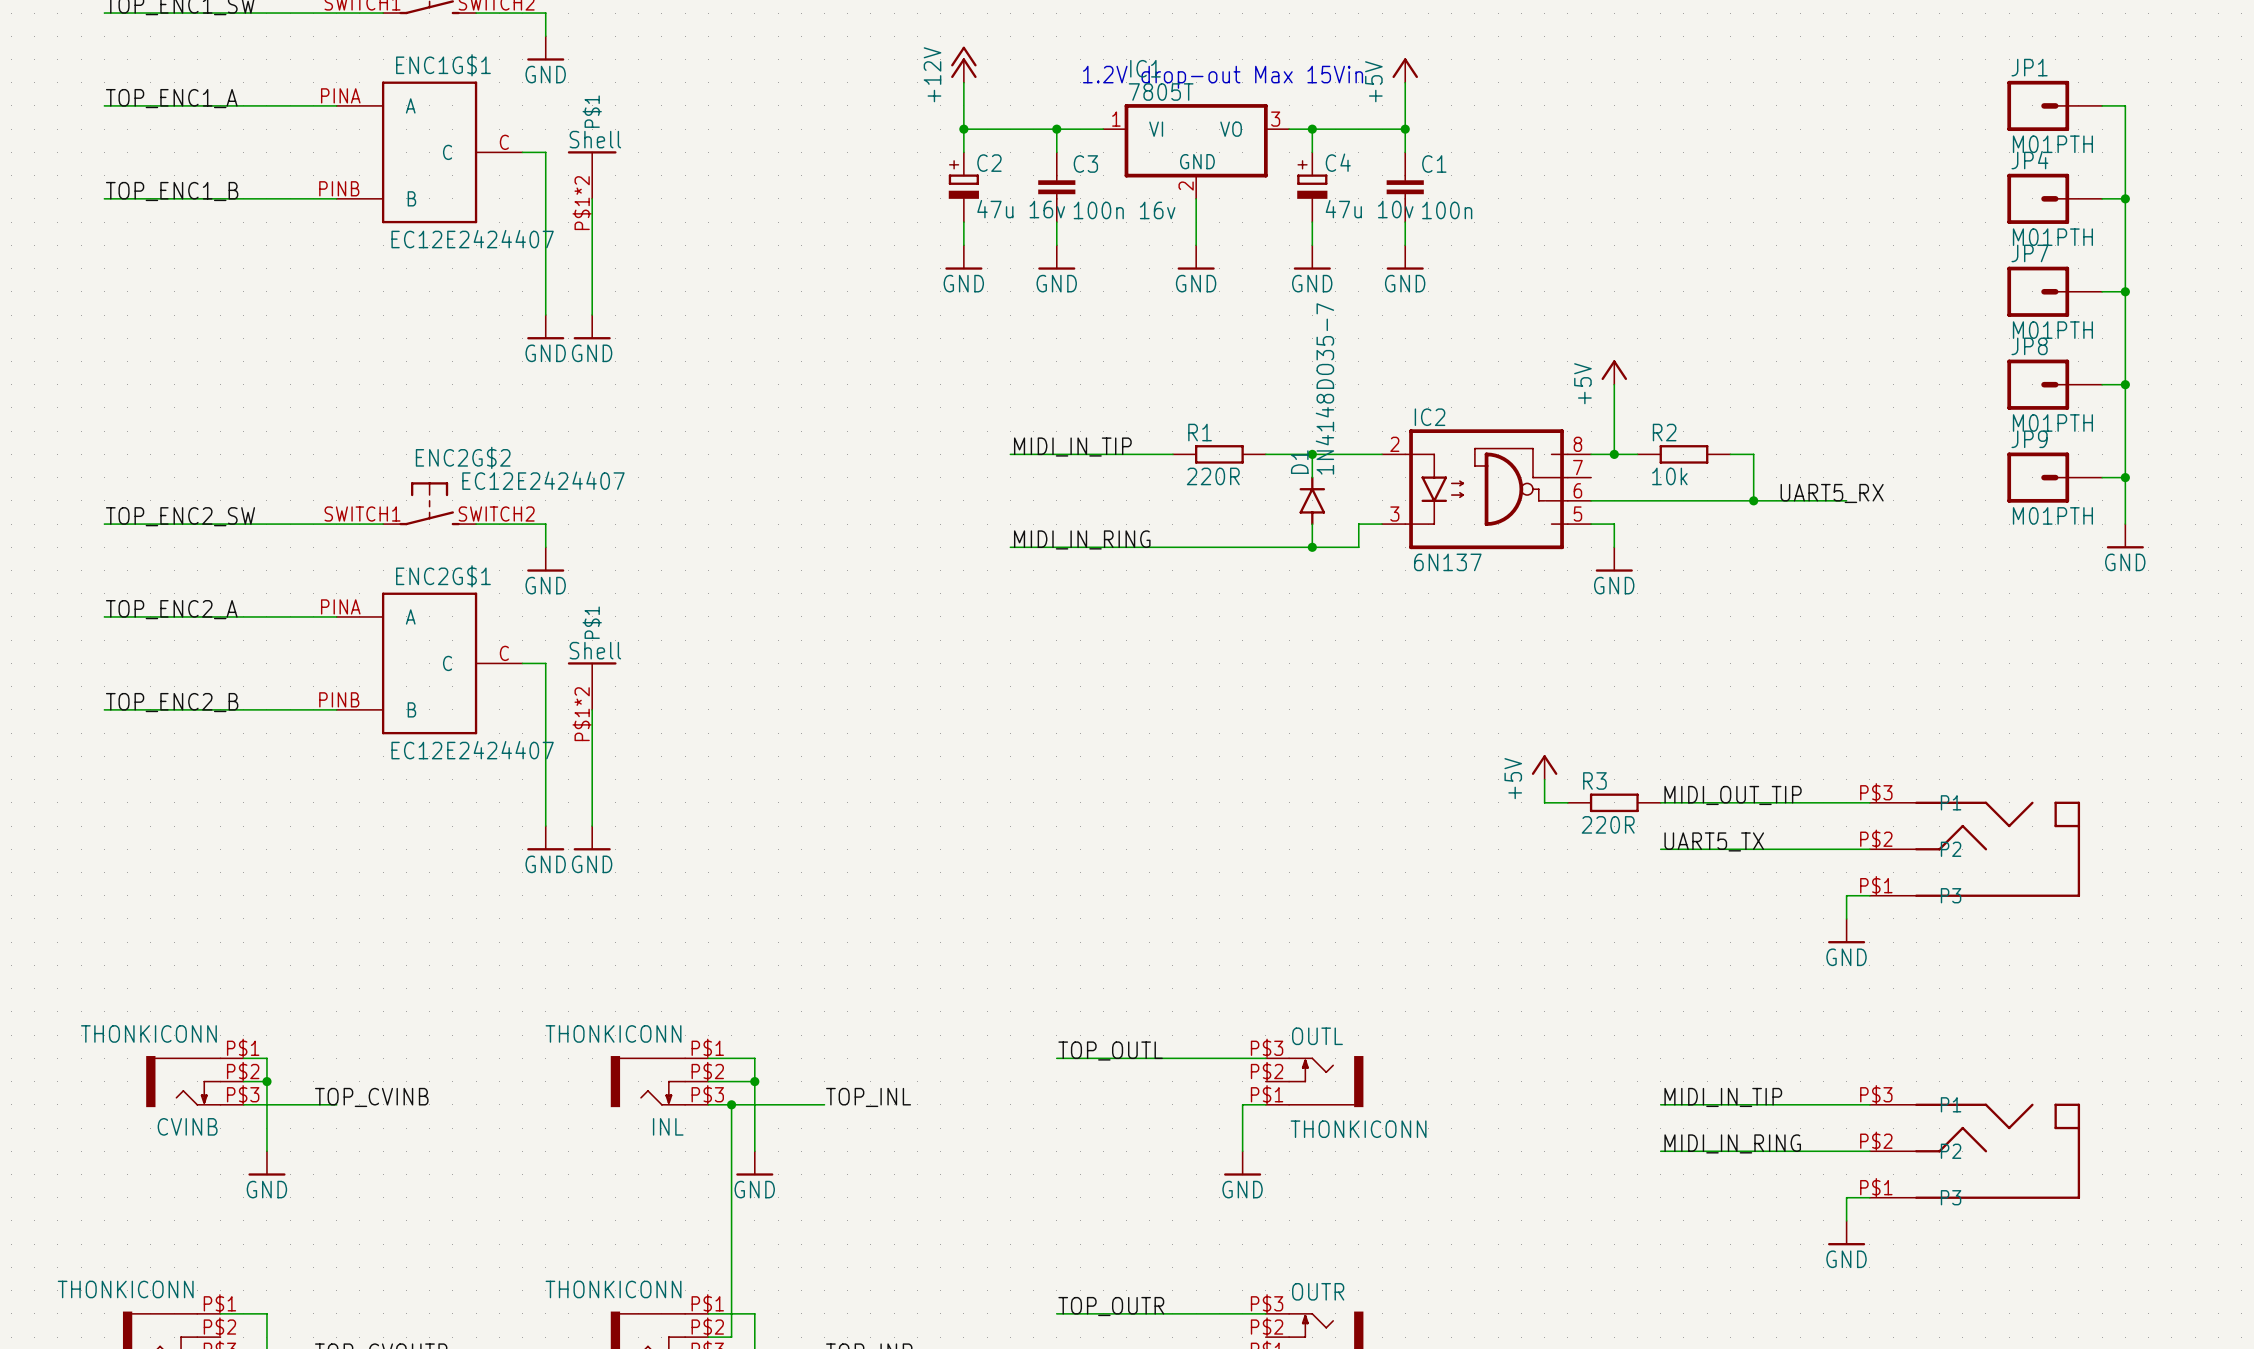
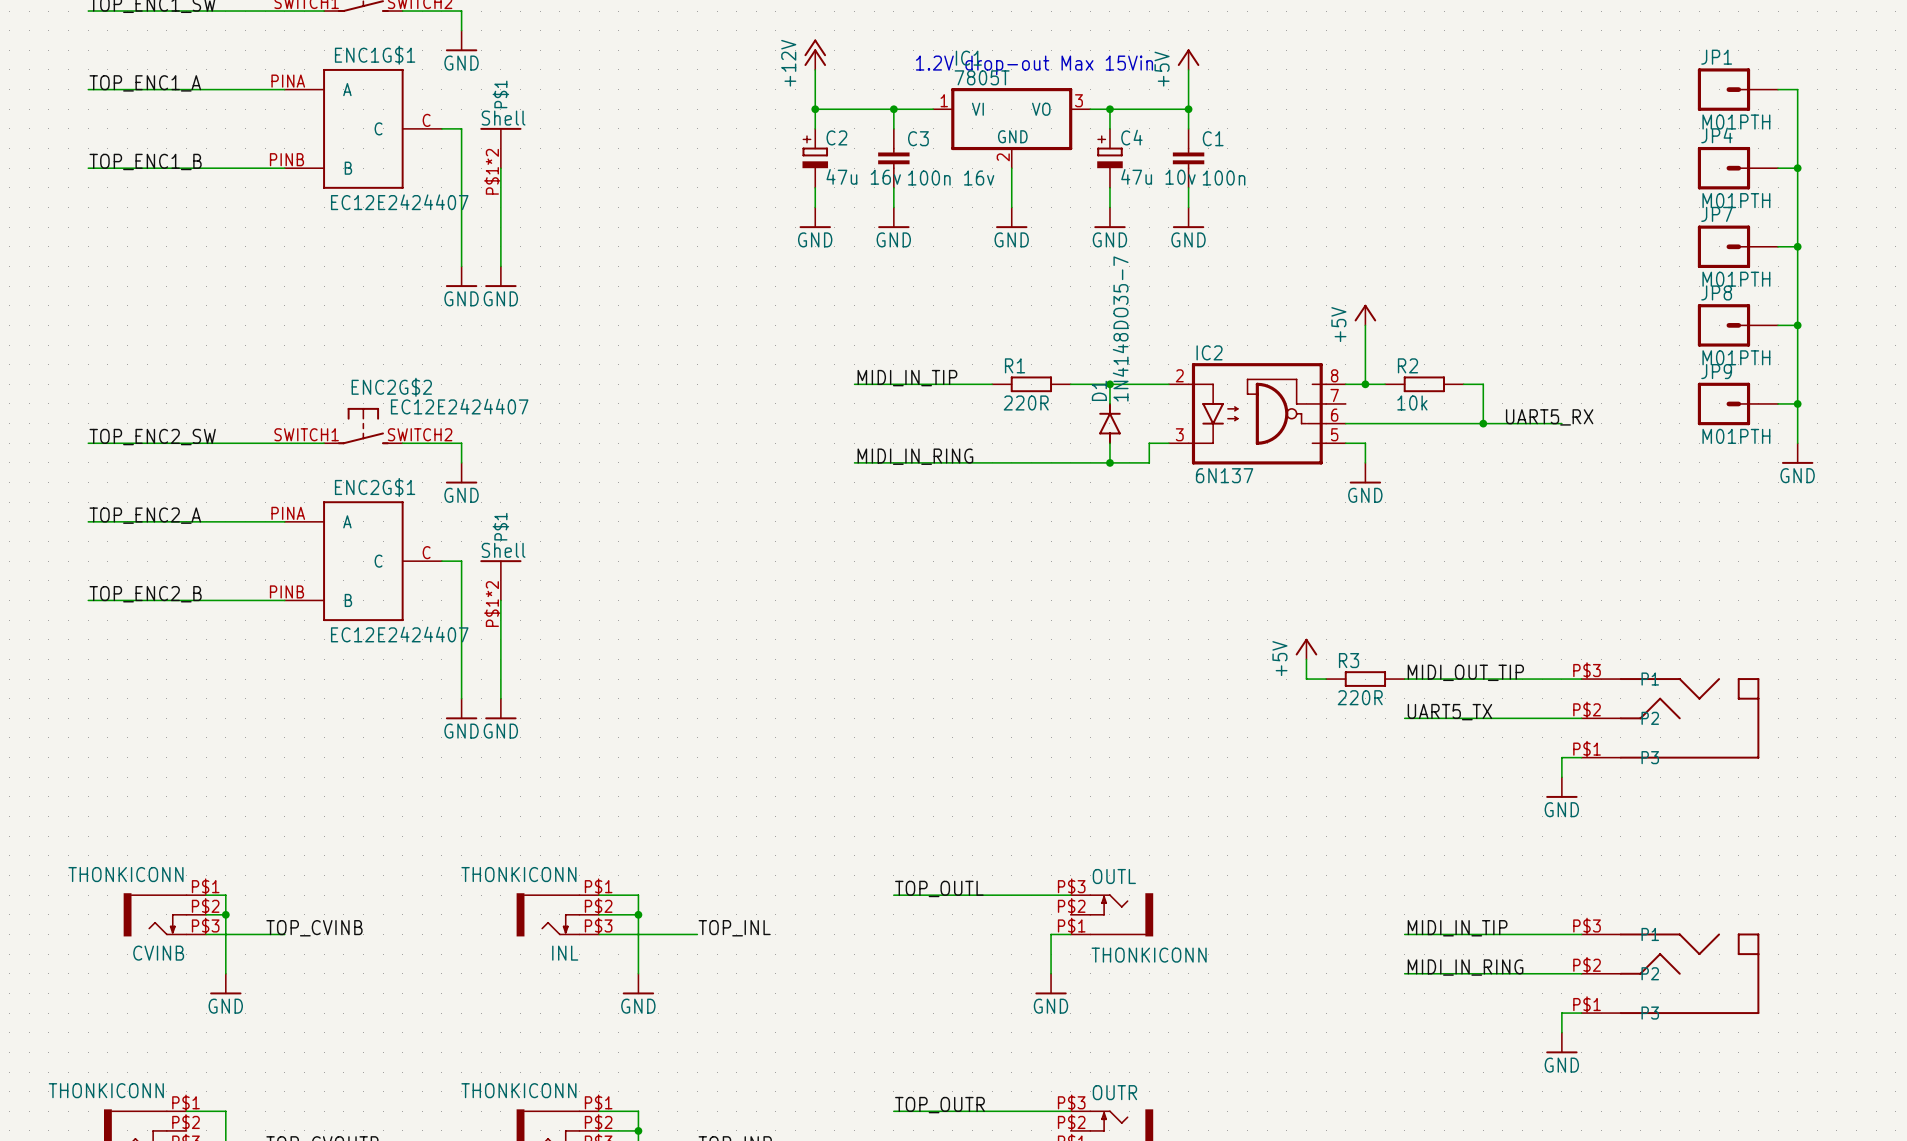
wire: (731, 1104) (731, 1337) -> (638, 1130) (618, 1130)
junction: (731, 1104) -> none
junction: none -> (638, 1130)

